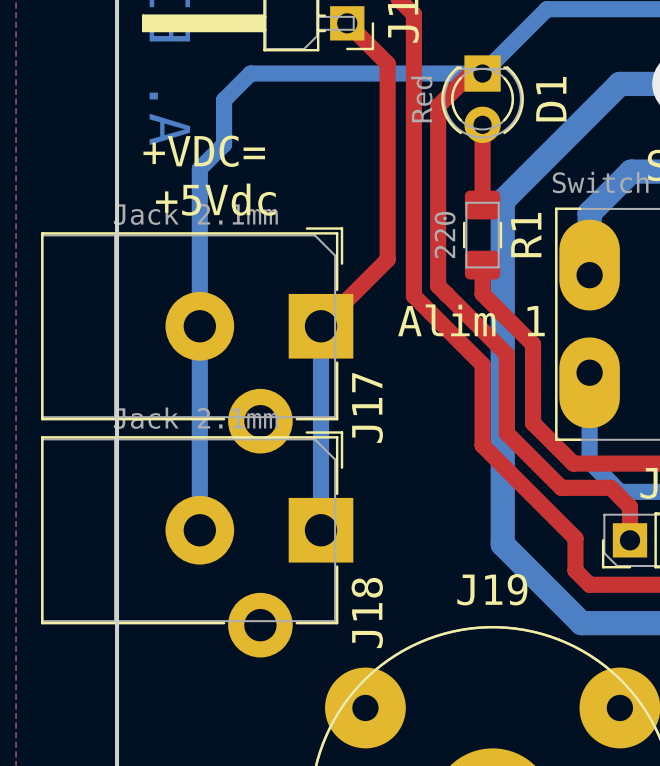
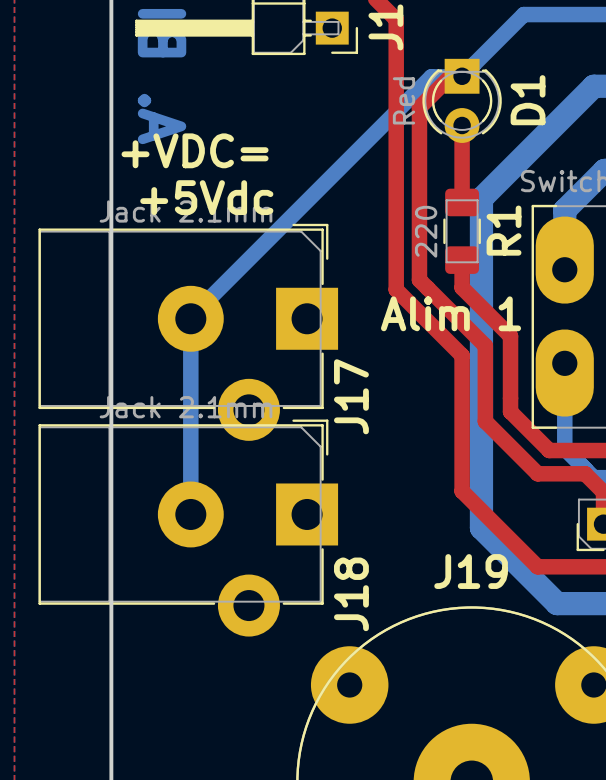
top track: (347, 23) (387, 63) (387, 259) (321, 326) -> none
bottom track: (482, 73) (250, 73) (224, 100) (224, 144) (199, 168) (199, 326) -> none
bottom track: none -> (431, 76) (199, 308)
bottom track: (321, 326) (321, 530) -> none
top track: (482, 445) (575, 538) (575, 570) (589, 584) -> (462, 433) (462, 491) (537, 566) (564, 566)

